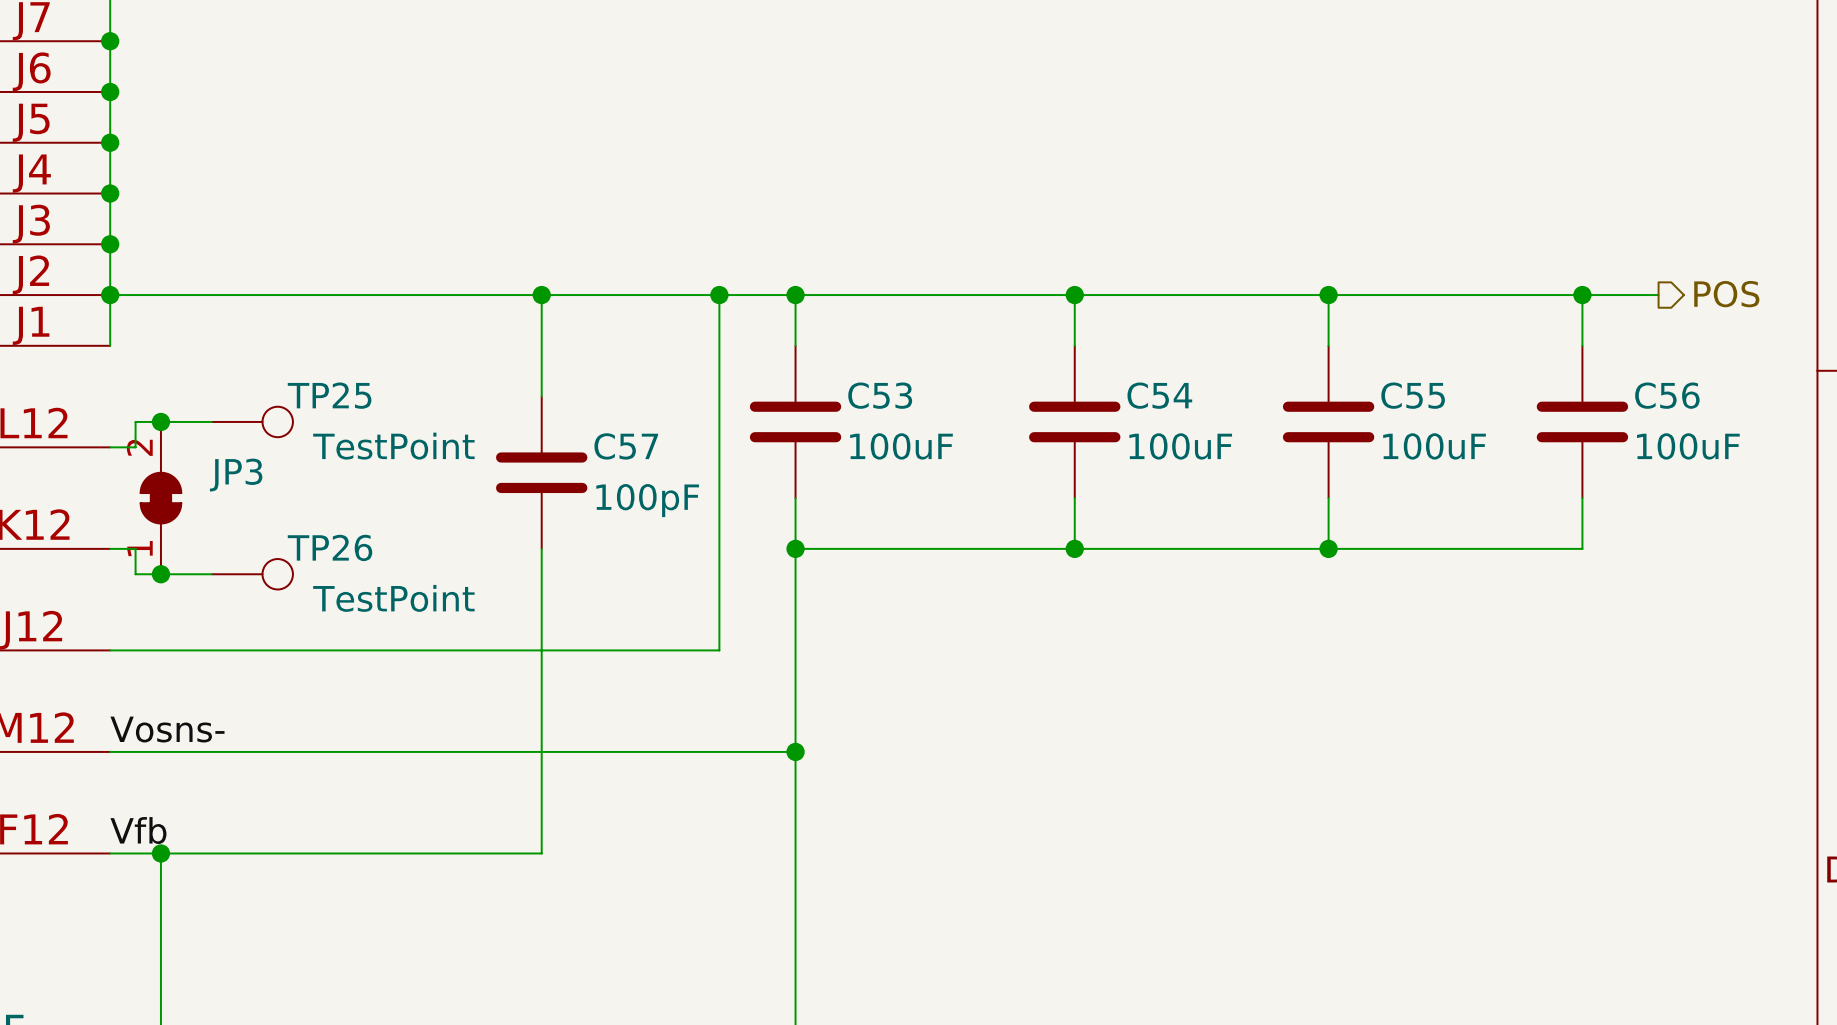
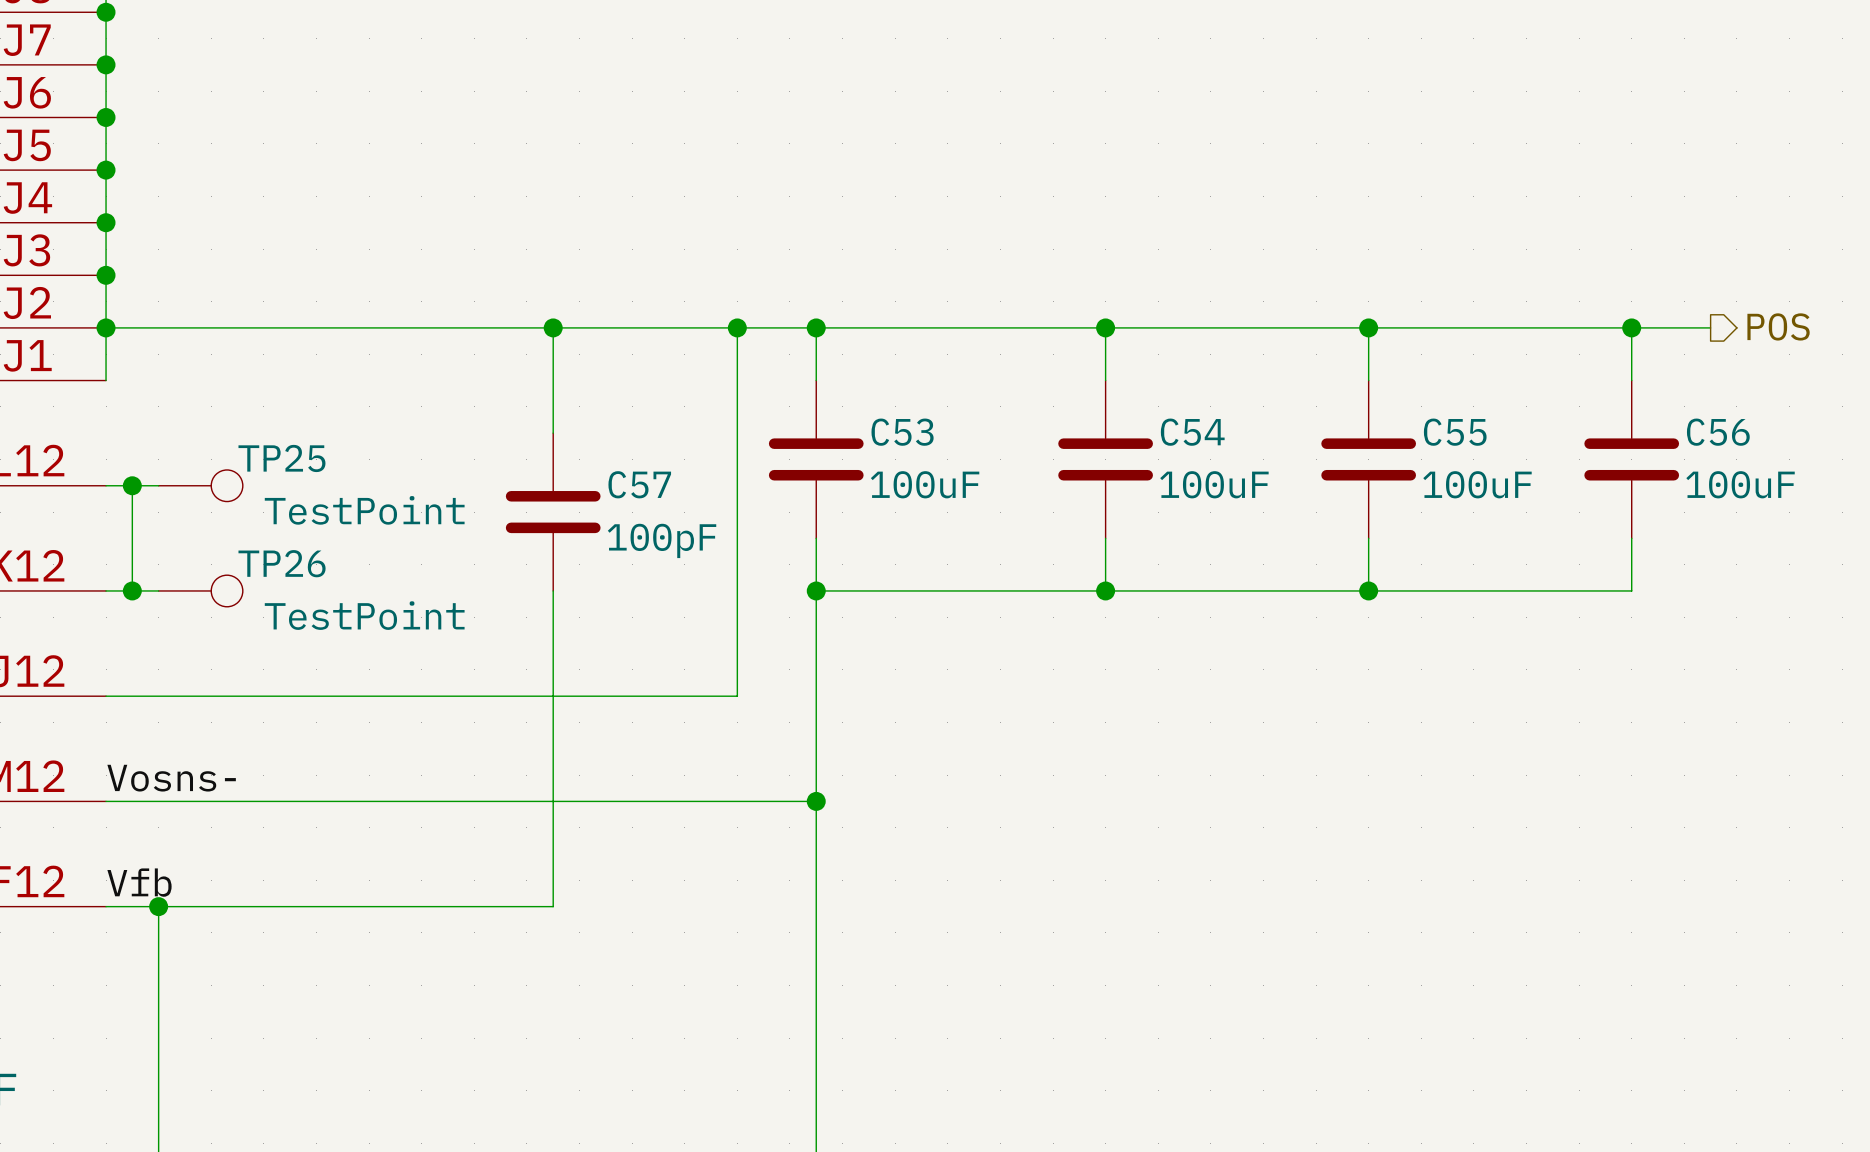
junction position: (160, 421) -> (132, 485)
wire: (211, 421) (135, 421) (135, 447) -> none
TP25 position: (252, 421) -> (200, 485)
wire: none -> (158, 485) (132, 485) (132, 590) (158, 590)
JP3: (160, 498) -> none
wire: (135, 548) (135, 574) (211, 574) -> none
junction position: (160, 574) -> (132, 590)
TP26 position: (252, 574) -> (200, 590)

